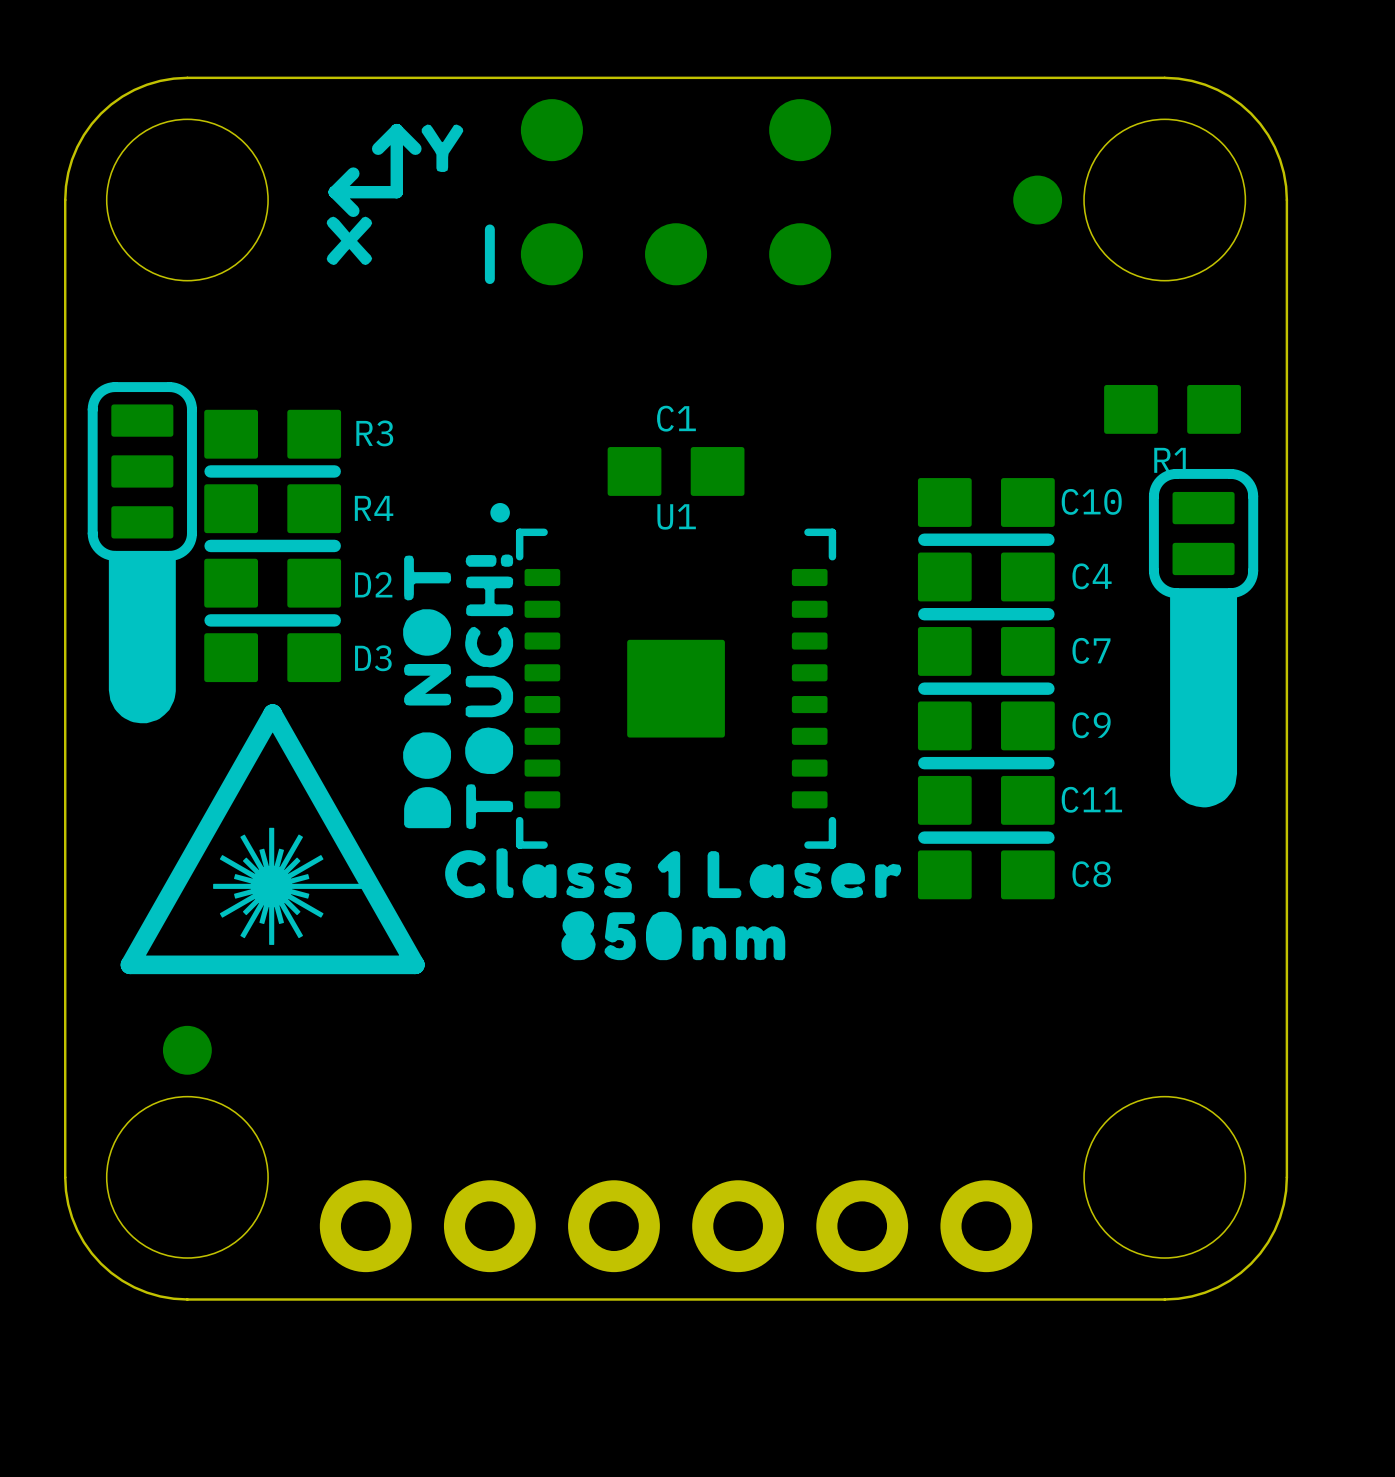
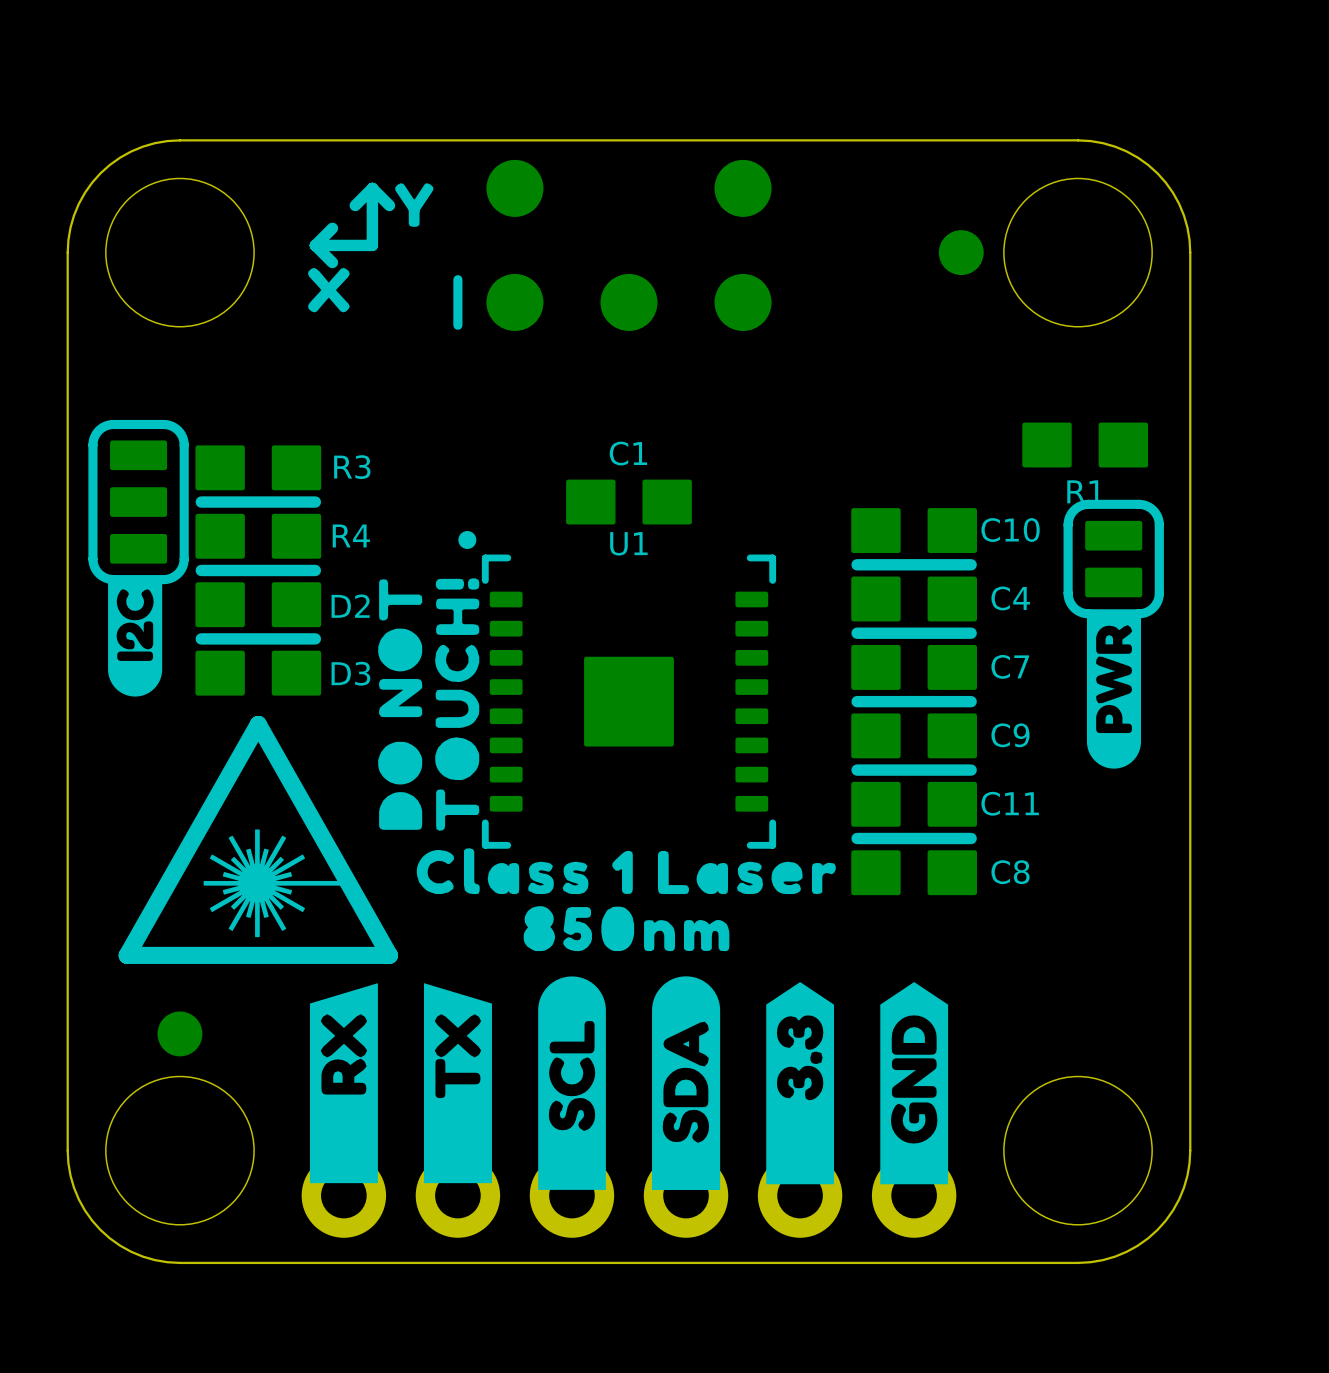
drawing shape: [108, 556, 176, 724] -> [108, 580, 163, 697]
drawing shape: [1170, 593, 1238, 808] -> [1086, 616, 1142, 769]
drawing: none -> [309, 976, 949, 1190]

